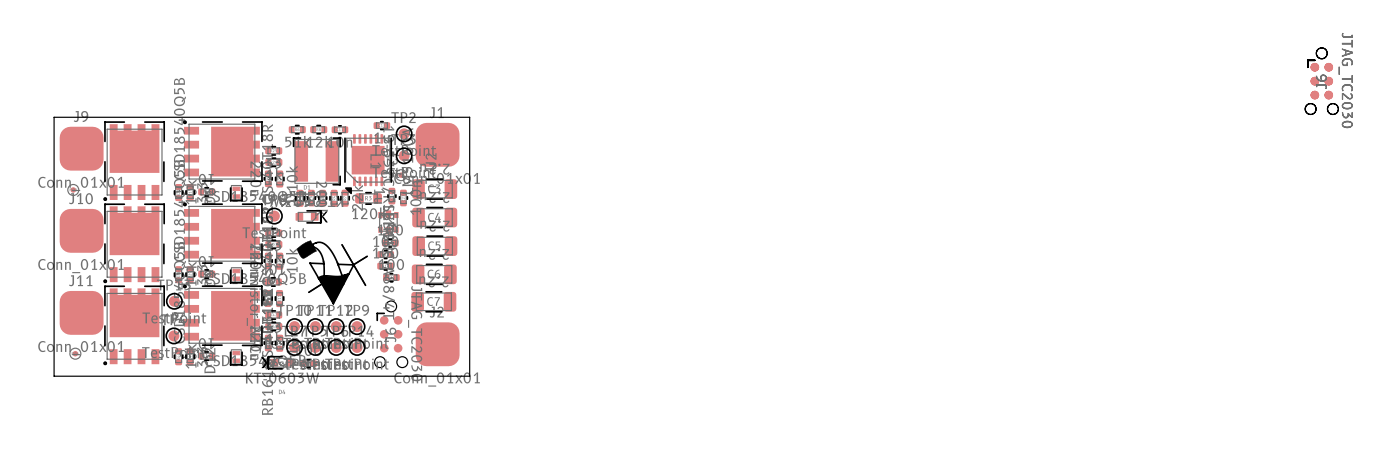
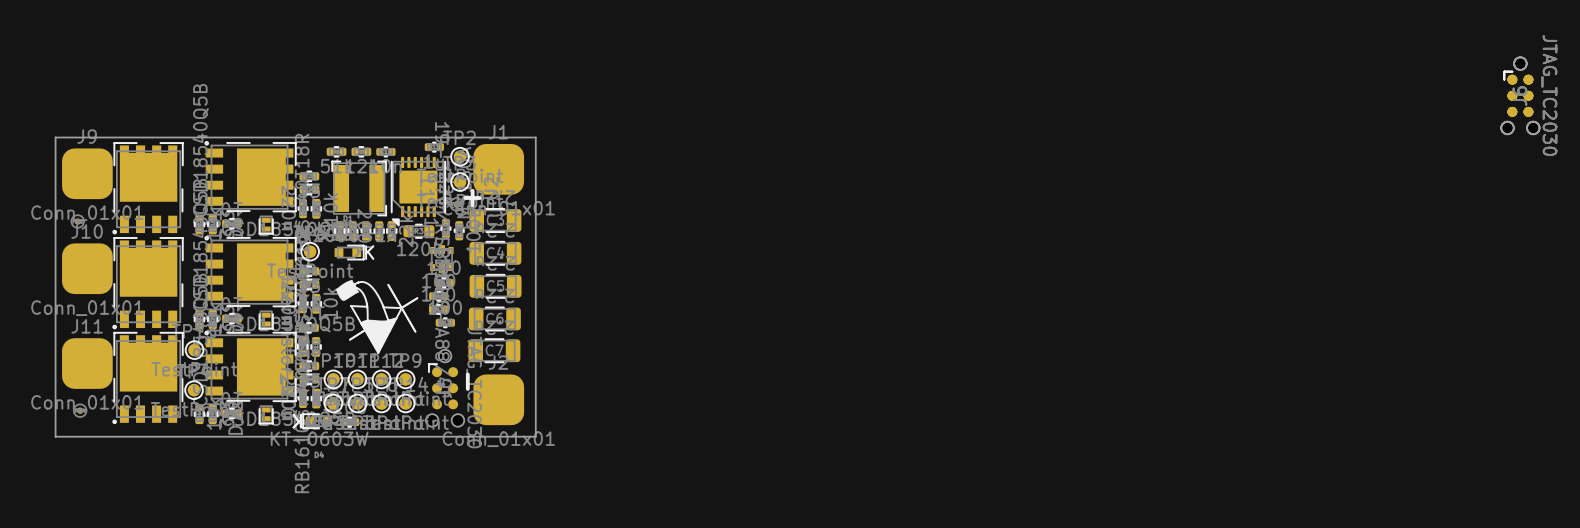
text: none -> + (472, 198)
text: none -> - (467, 381)

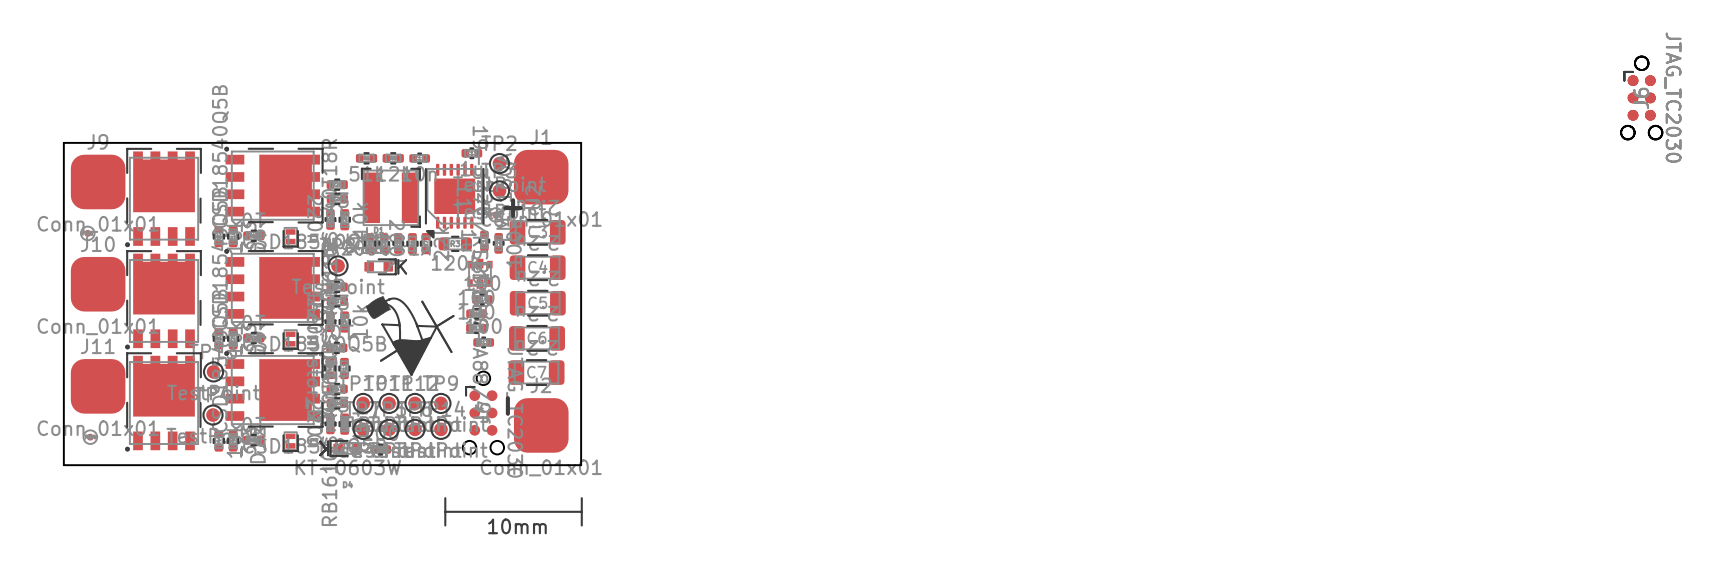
line: none -> (445, 498) (445, 525)
line: none -> (581, 498) (581, 525)
line: none -> (445, 511) (581, 511)
text: none -> 10mm (517, 526)

